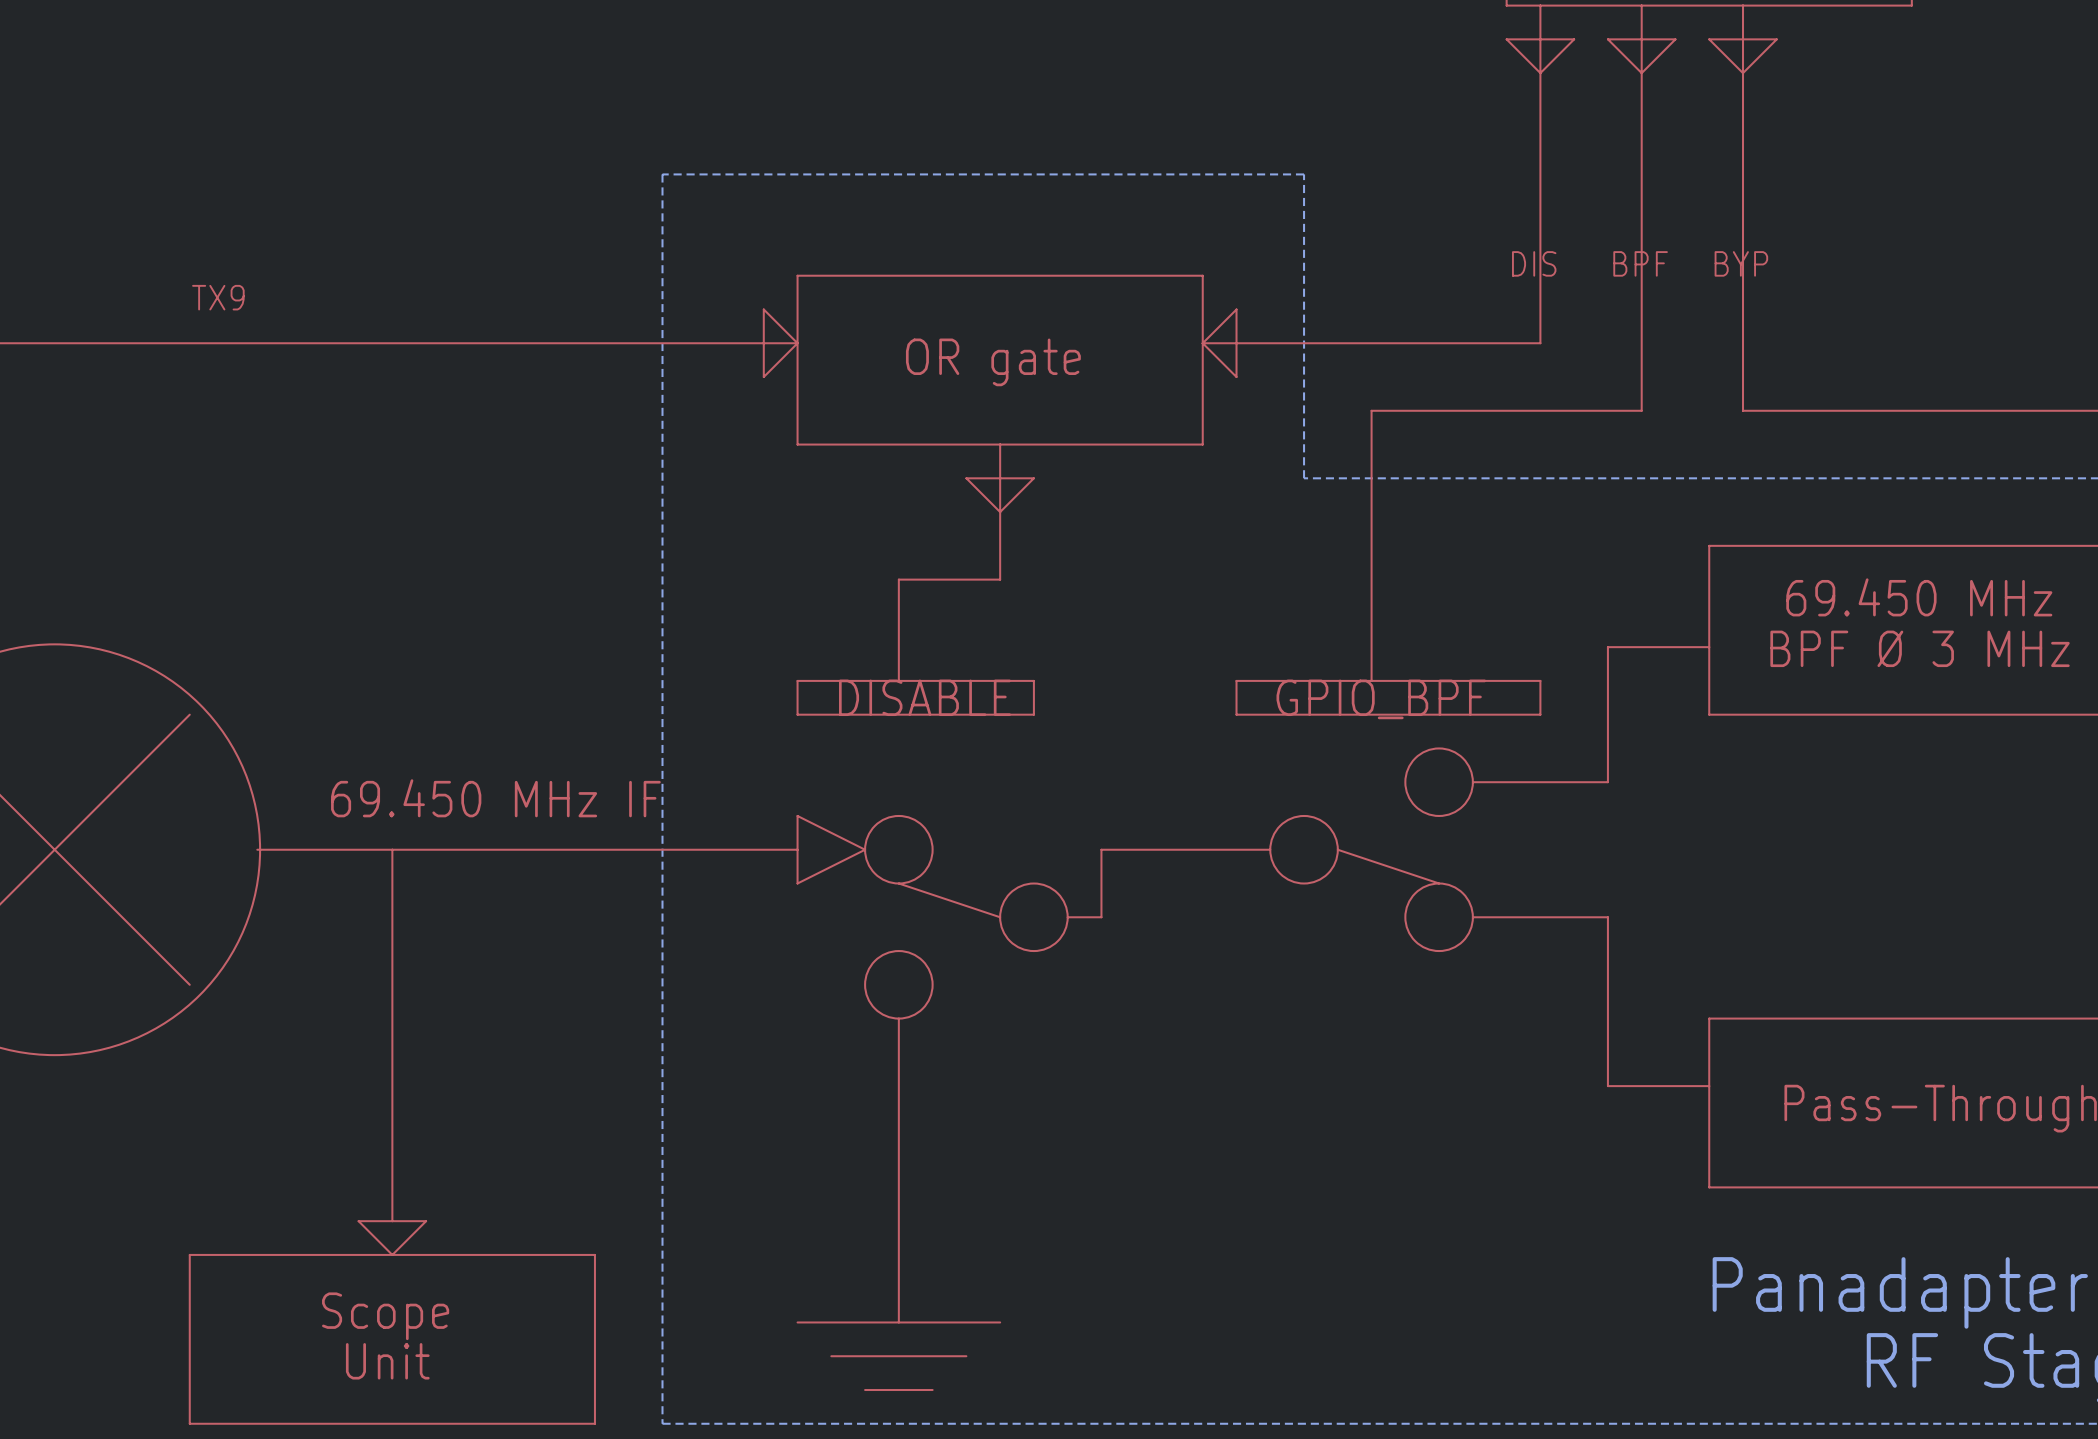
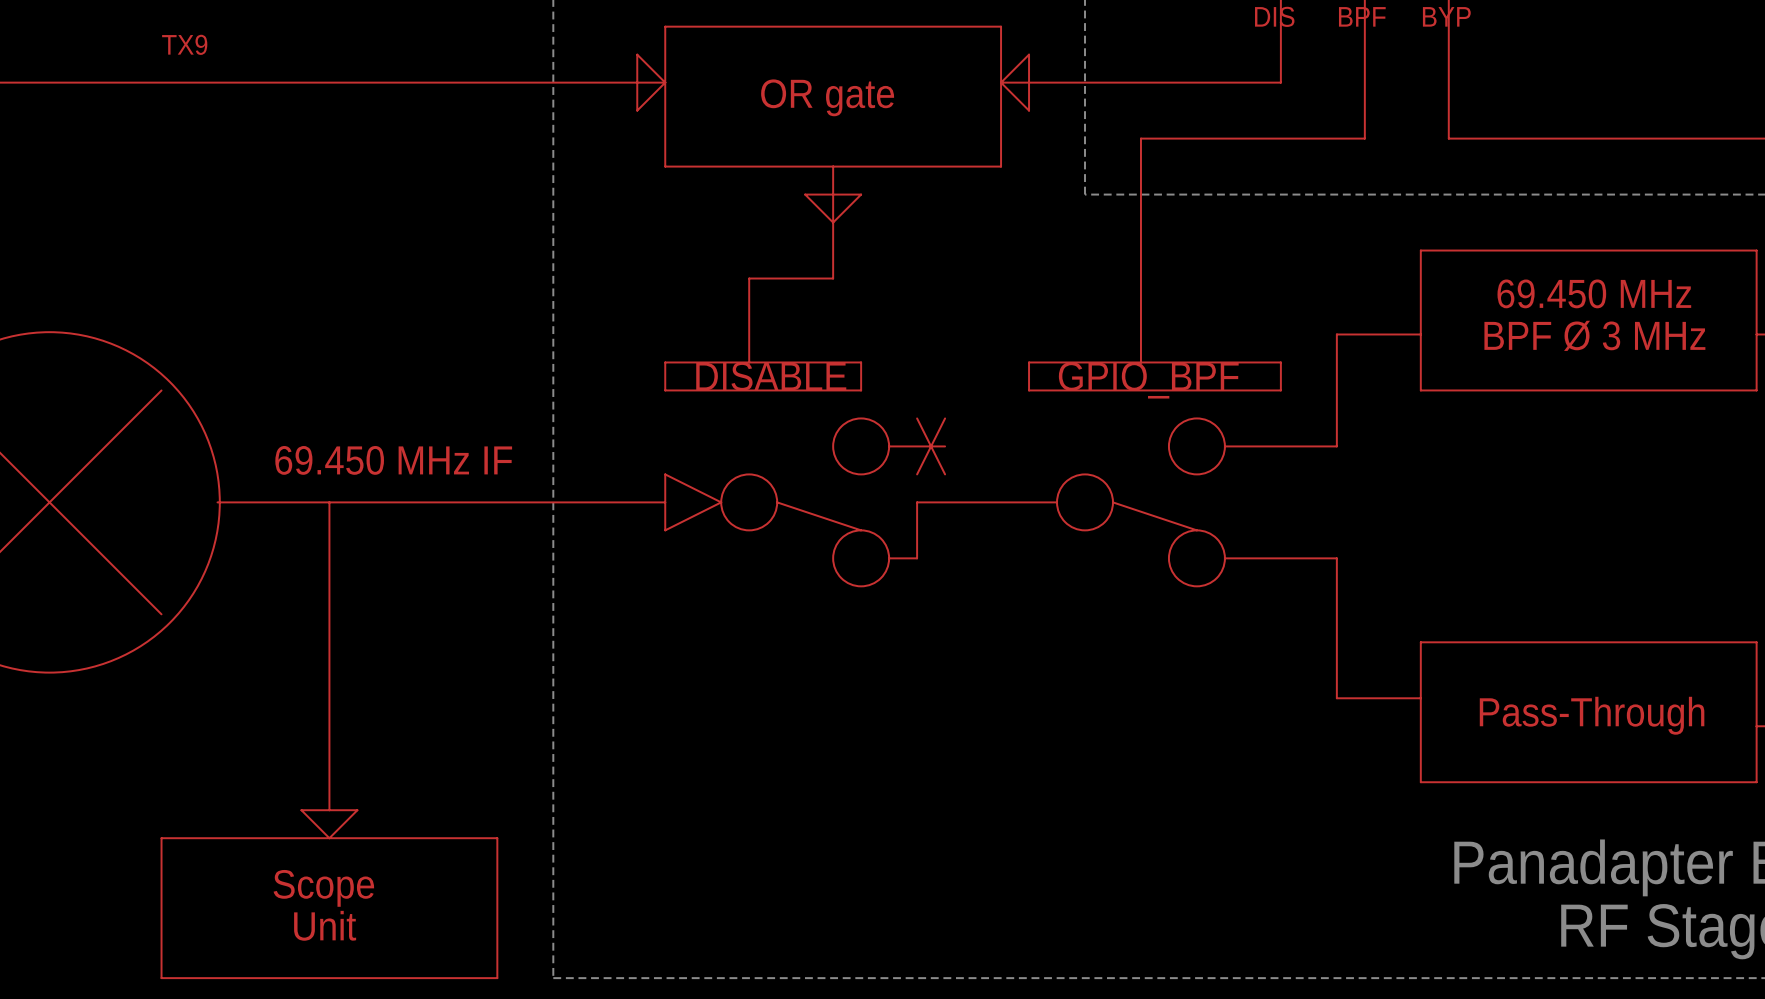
line: none -> (917, 418) (945, 474)
line: none -> (945, 418) (917, 474)
line: none -> (889, 446) (945, 446)
line: (898, 883) (1000, 917) -> (777, 502) (861, 530)
drawing position: (898, 984) -> (861, 446)
line: (898, 1018) (898, 1322) -> none
line: (797, 1322) (1000, 1322) -> none
line: (831, 1356) (966, 1356) -> none
line: (865, 1390) (932, 1390) -> none

